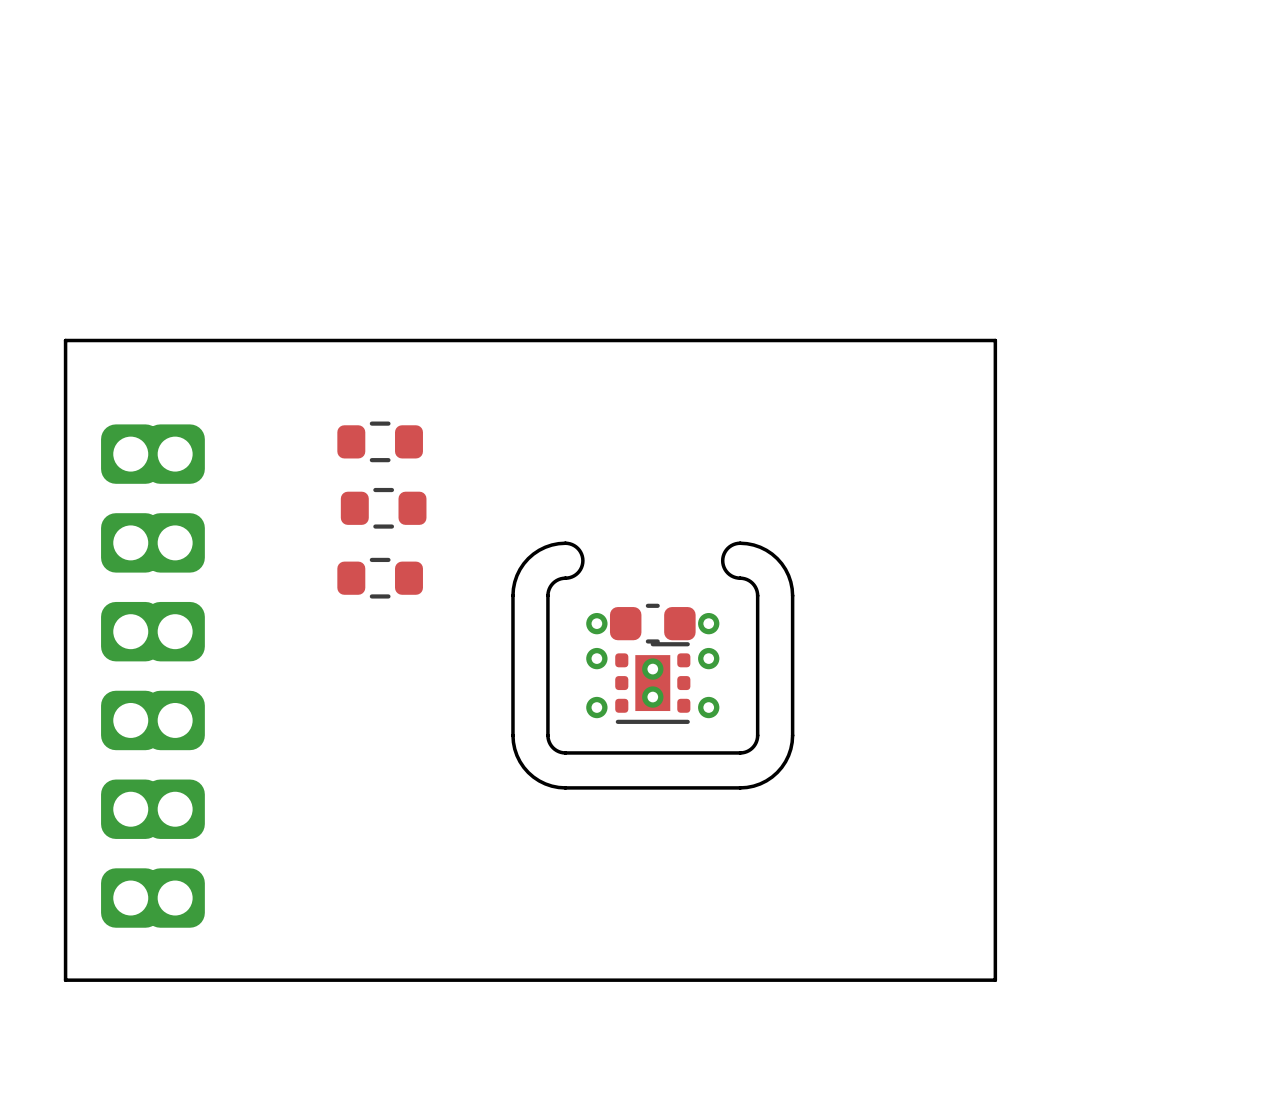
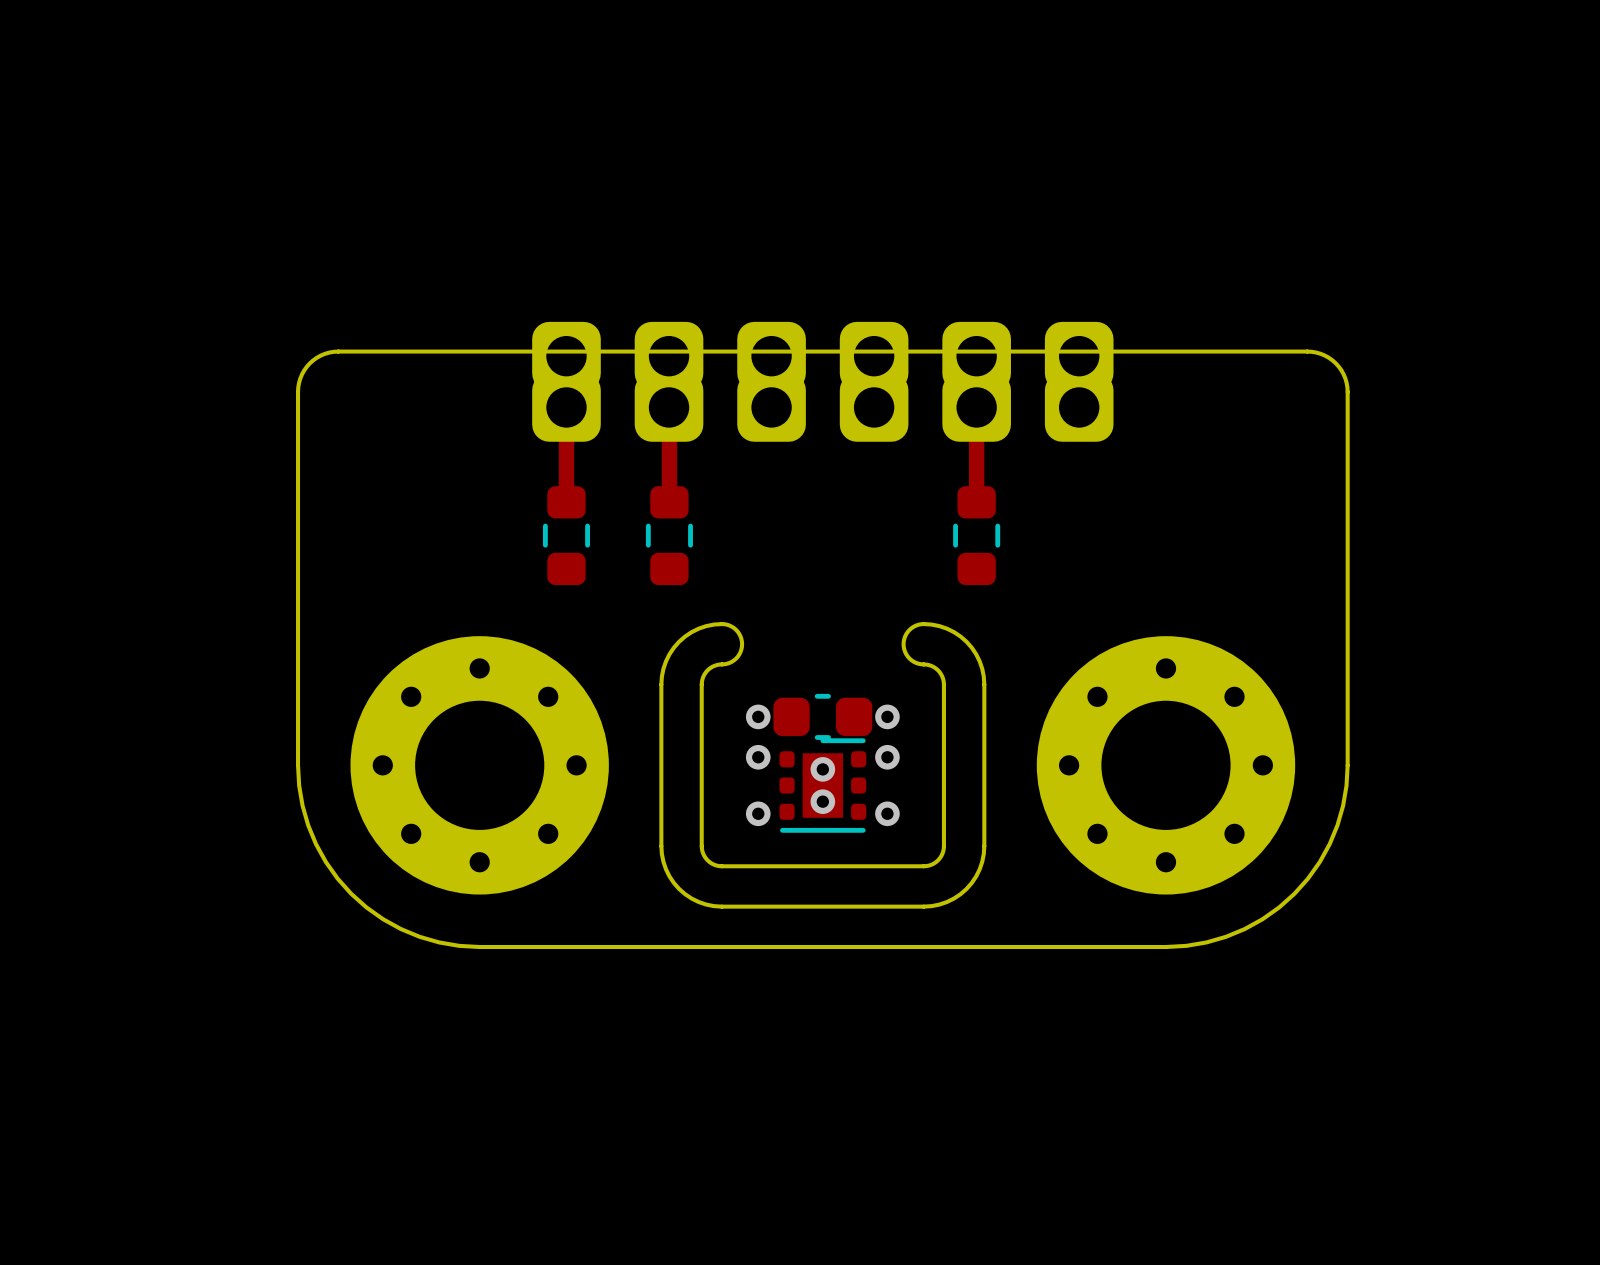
board edge: (65, 340) (995, 340) (995, 980) (65, 980) (65, 340) -> (338, 351) (320, 355) (309, 363) (302, 374) (298, 387) (299, 785) (308, 825) (325, 862) (351, 893) (366, 907) (400, 929) (439, 942) (479, 947) (1186, 945) (1225, 936) (1262, 919) (1279, 907) (1308, 878) (1329, 844) (1343, 805) (1347, 765) (1347, 391) (1345, 378) (1341, 370) (1332, 360) (1324, 355) (1307, 351) (338, 351)
track: none -> (566, 407) (566, 502)
track: none -> (976, 407) (976, 502)
track: none -> (669, 407) (669, 502)
part: (380, 441) -> none
part: none -> (566, 535)
part: none -> (669, 535)
part: none -> (976, 535)
part: (383, 508) -> none
part: (380, 578) -> none
part: none -> (479, 765)
part: none -> (1165, 765)
part rotation: 0° (152, 676) -> 90° clockwise (822, 381)
part position: (152, 676) -> (822, 381)

